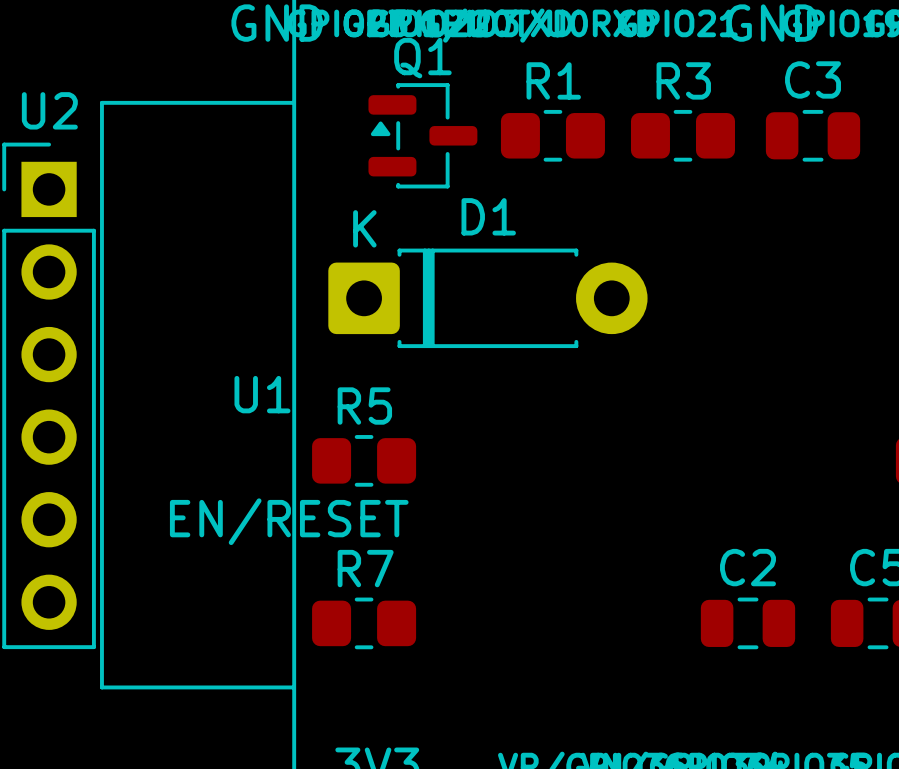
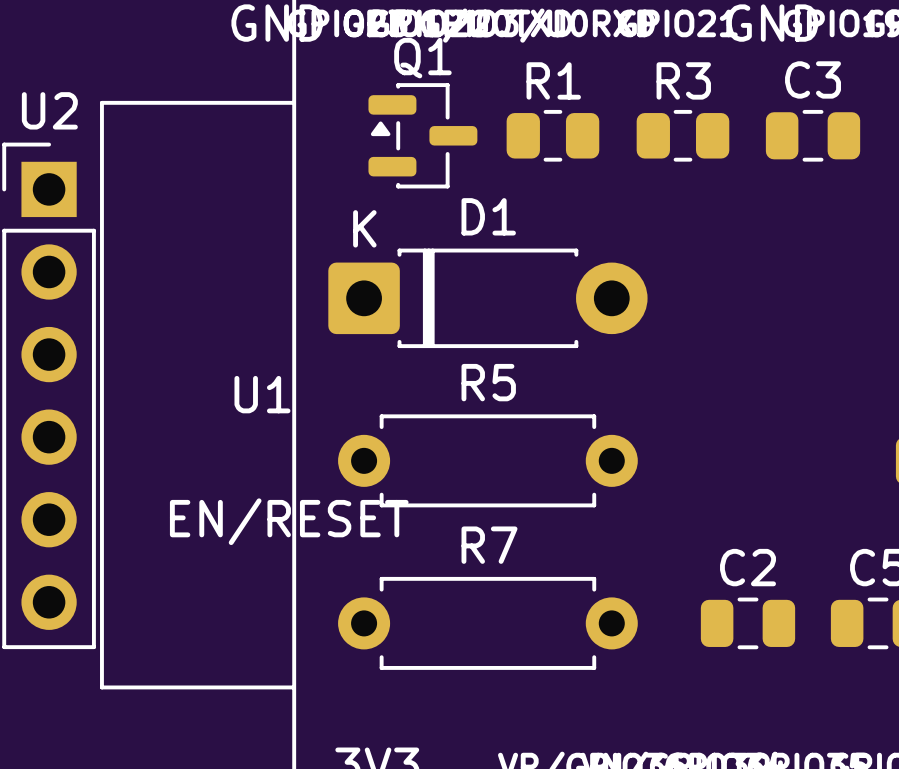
R1 footprint: [500, 109, 605, 162] -> [506, 109, 600, 162]
R3 footprint: [630, 109, 736, 162] -> [636, 109, 730, 162]
R5 footprint: [312, 435, 417, 487] -> [338, 414, 638, 508]
R7 footprint: [312, 597, 417, 650] -> [338, 576, 638, 670]

